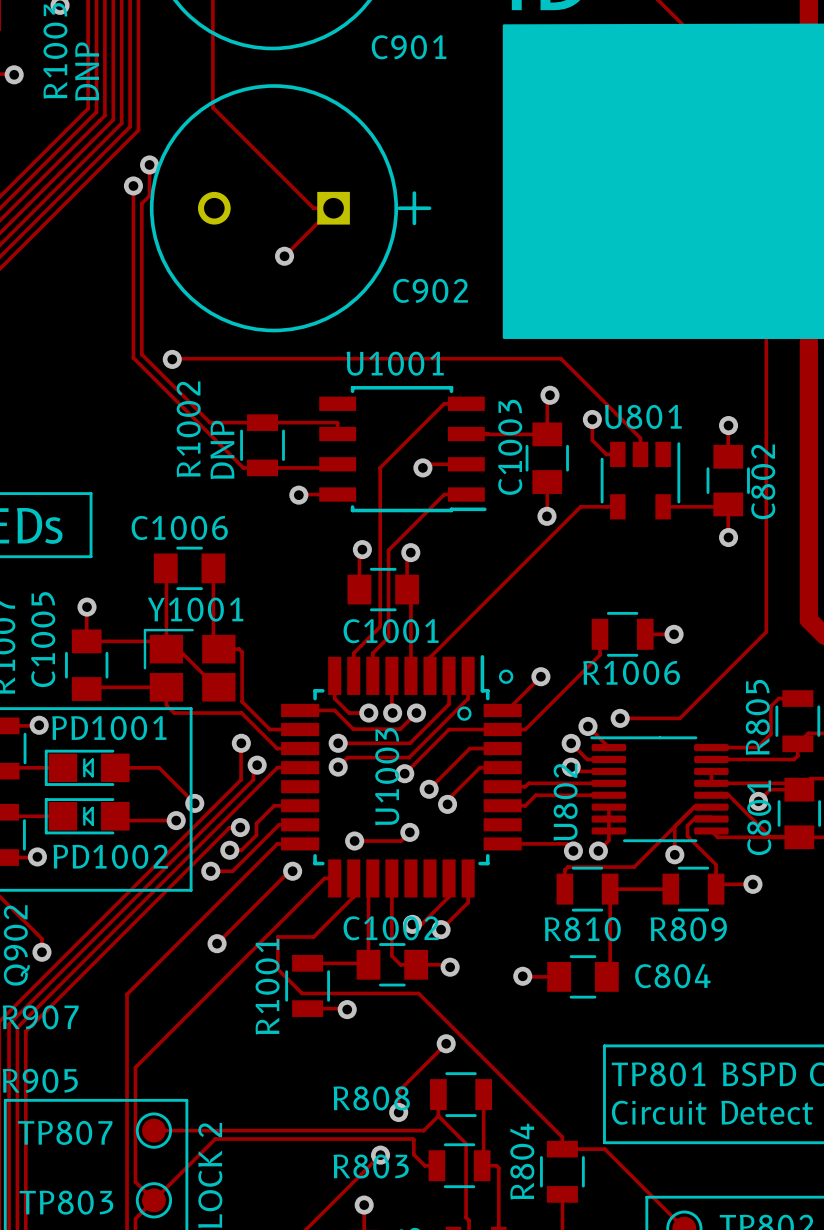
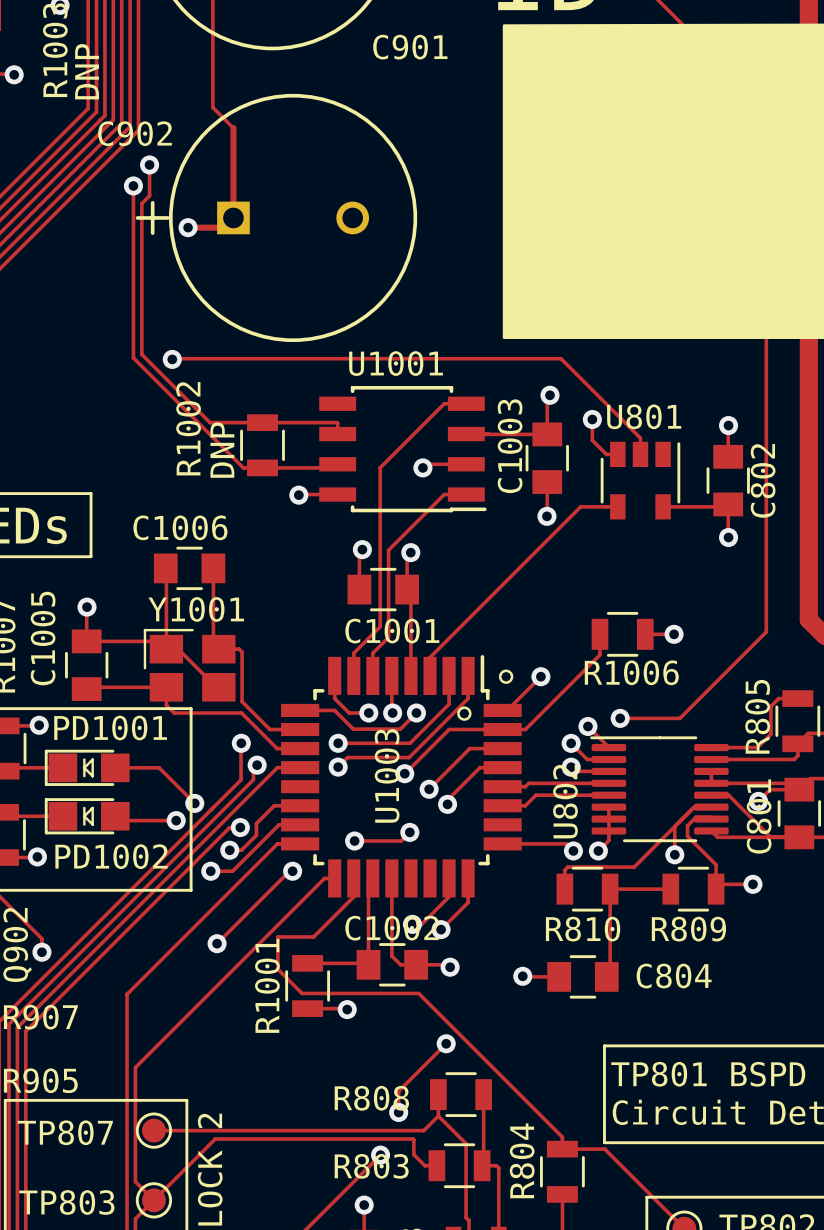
track: (233, 128) (313, 208) (333, 208) -> (233, 128) (233, 217) (223, 227) (188, 227)
C902 rotation: 0° (290, 208) -> 180° (276, 217)
track: (332, 208) (284, 256) -> none
via position: (284, 256) -> (188, 227)

